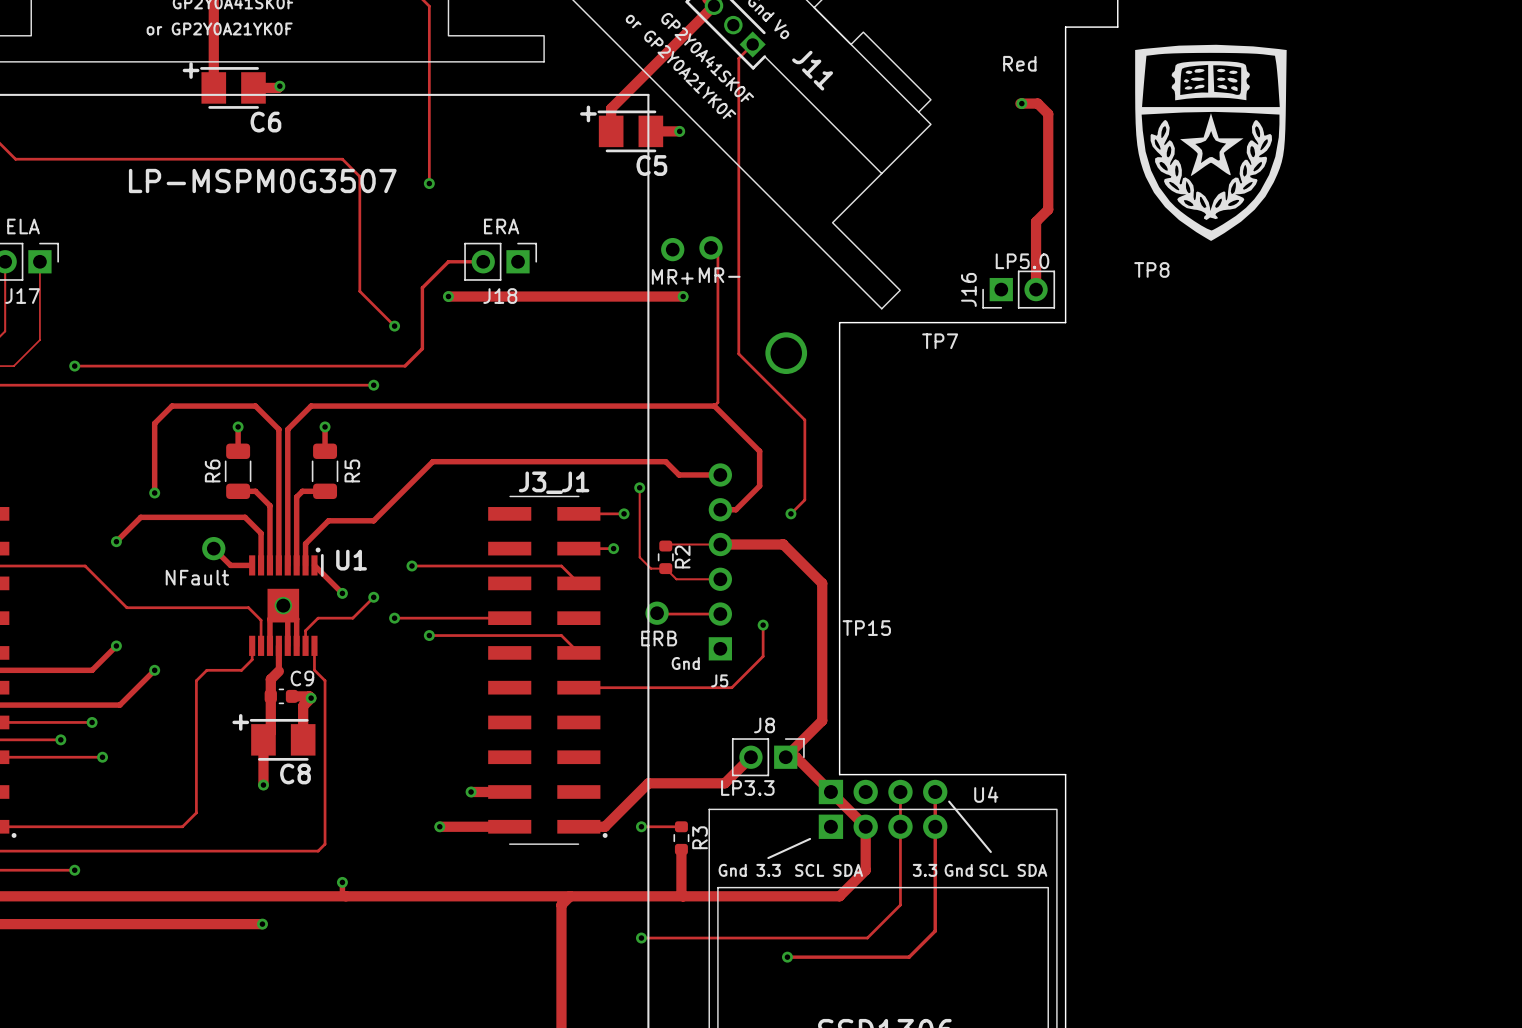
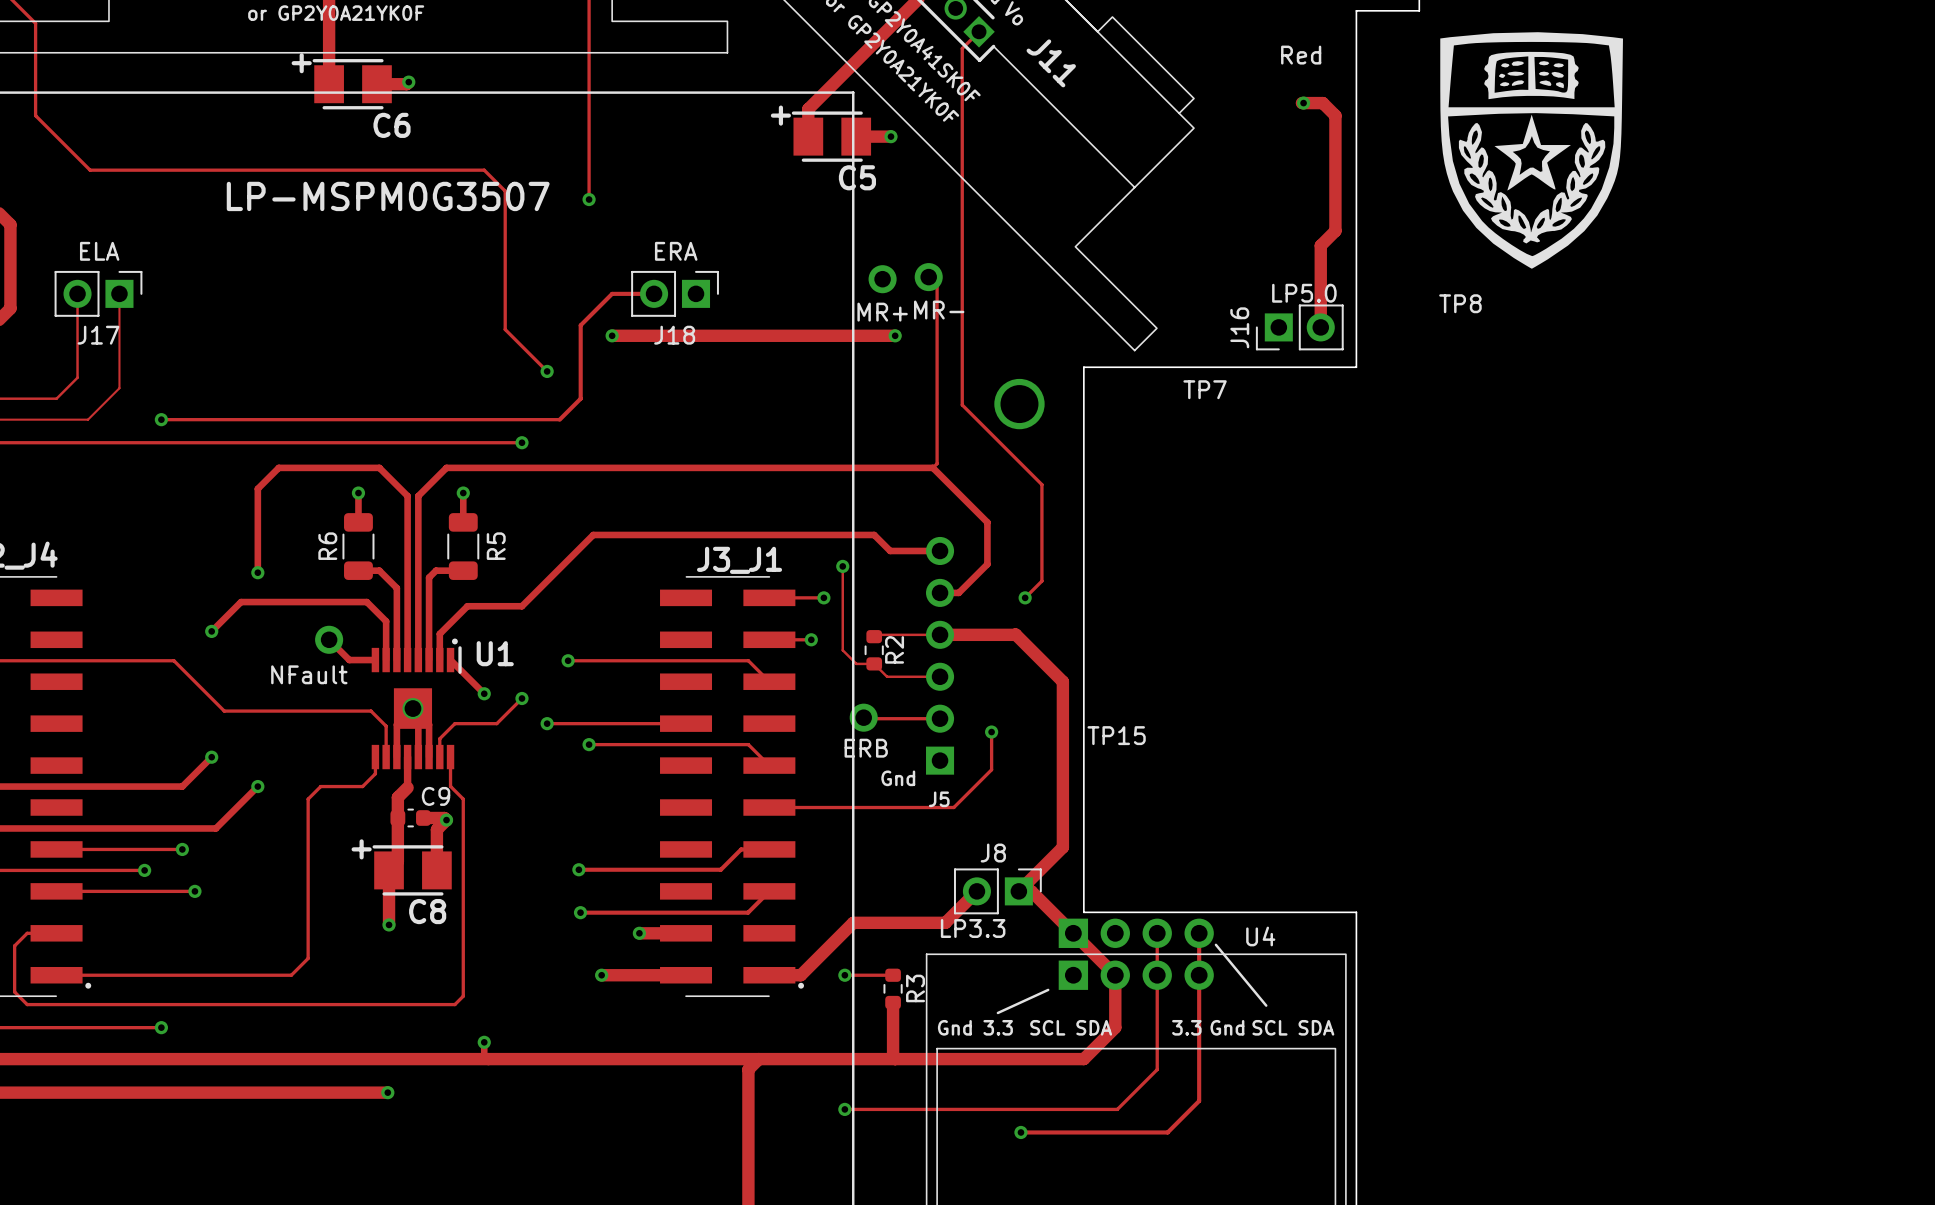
track: none -> (769, 849) (741, 849) (720, 869) (578, 869)
via: none -> (578, 869)
track: none -> (748, 891) (769, 891) (748, 912) (580, 912)
via: none -> (580, 912)

